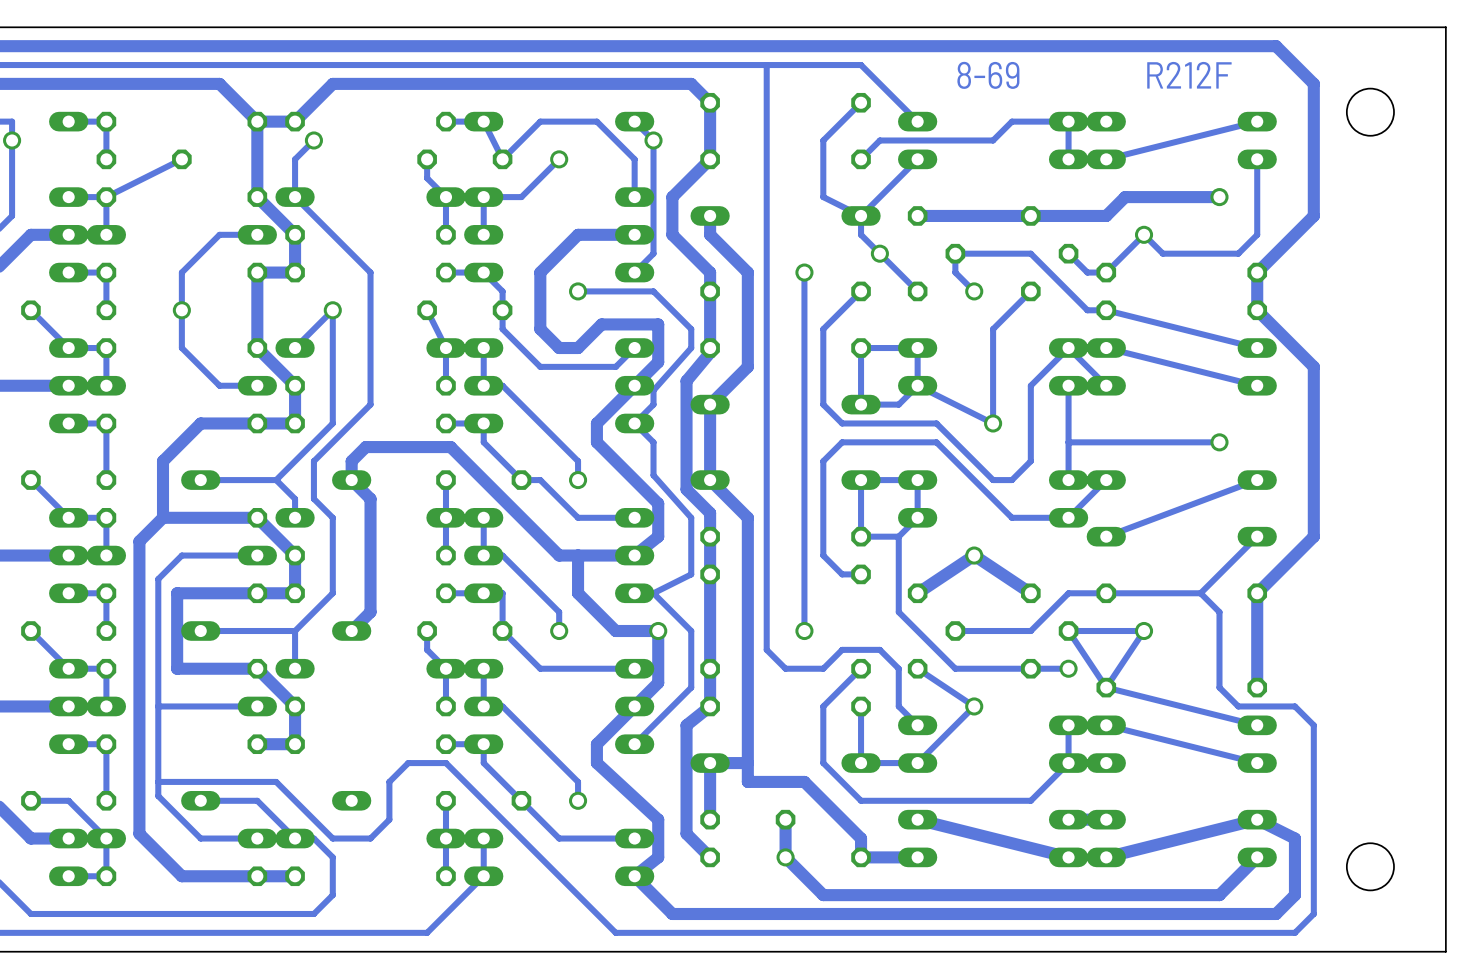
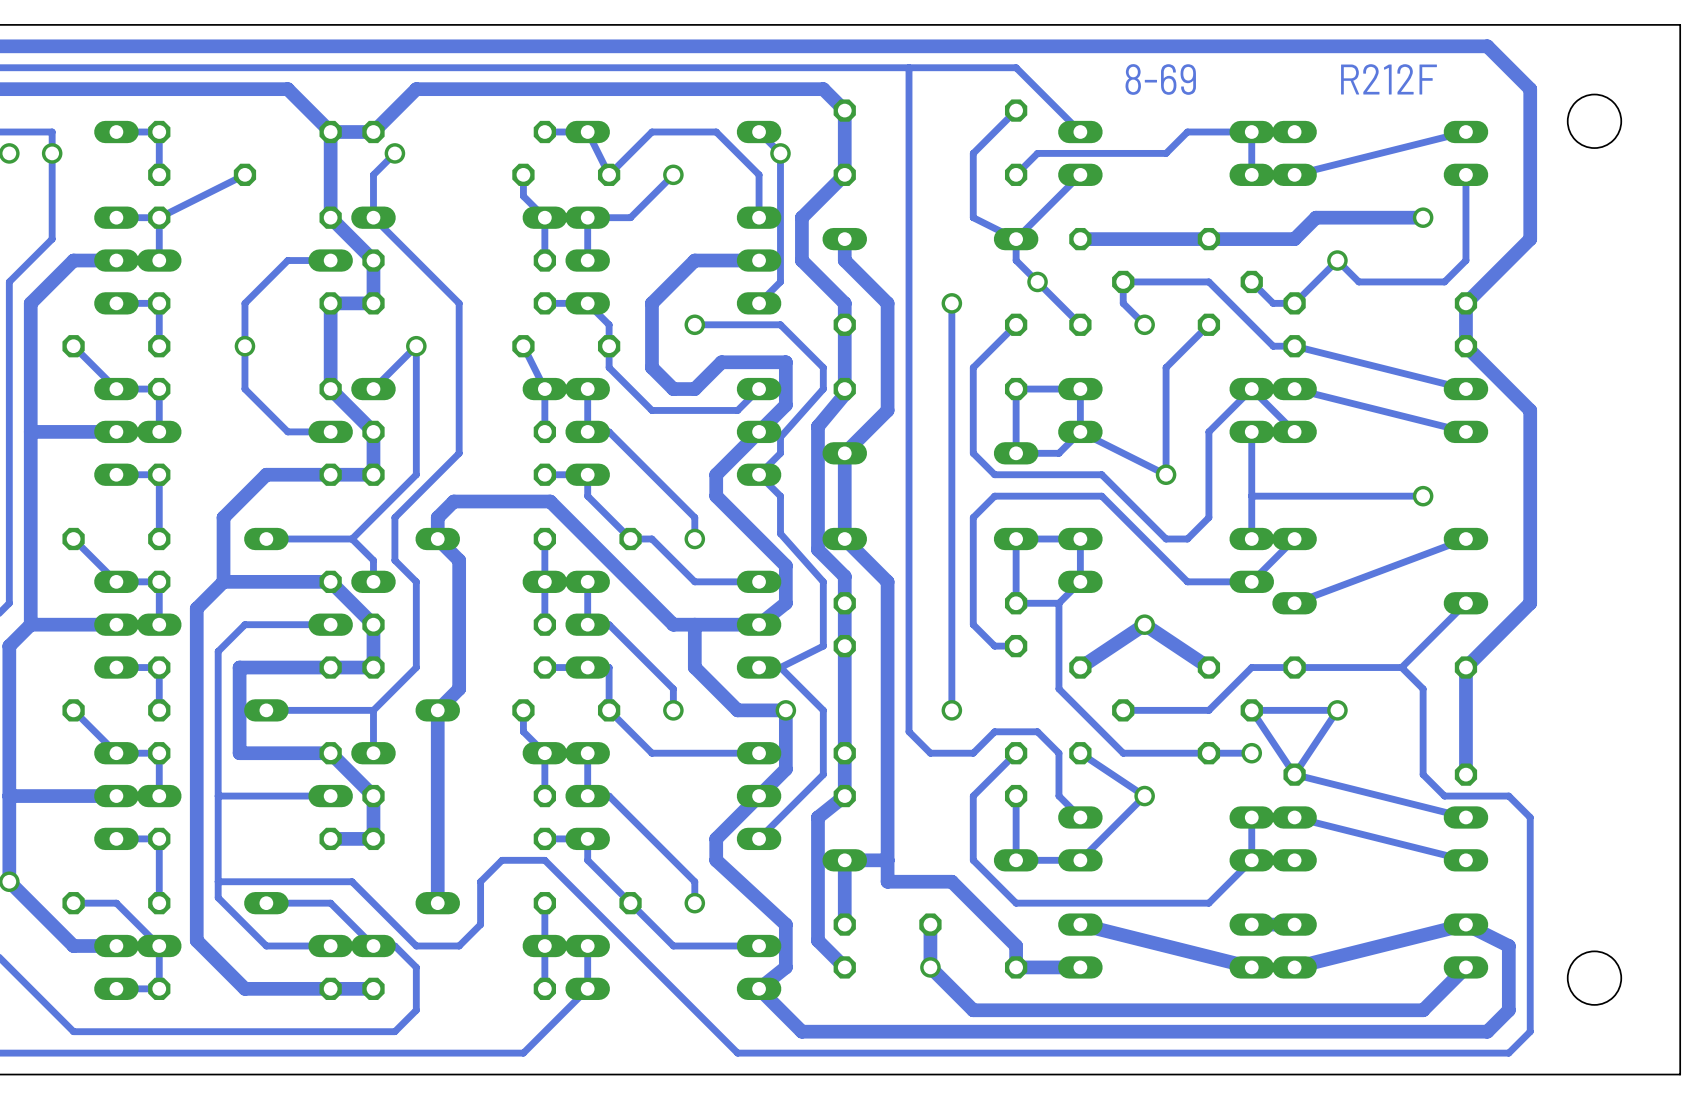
track: none -> (437, 710) (437, 903)

